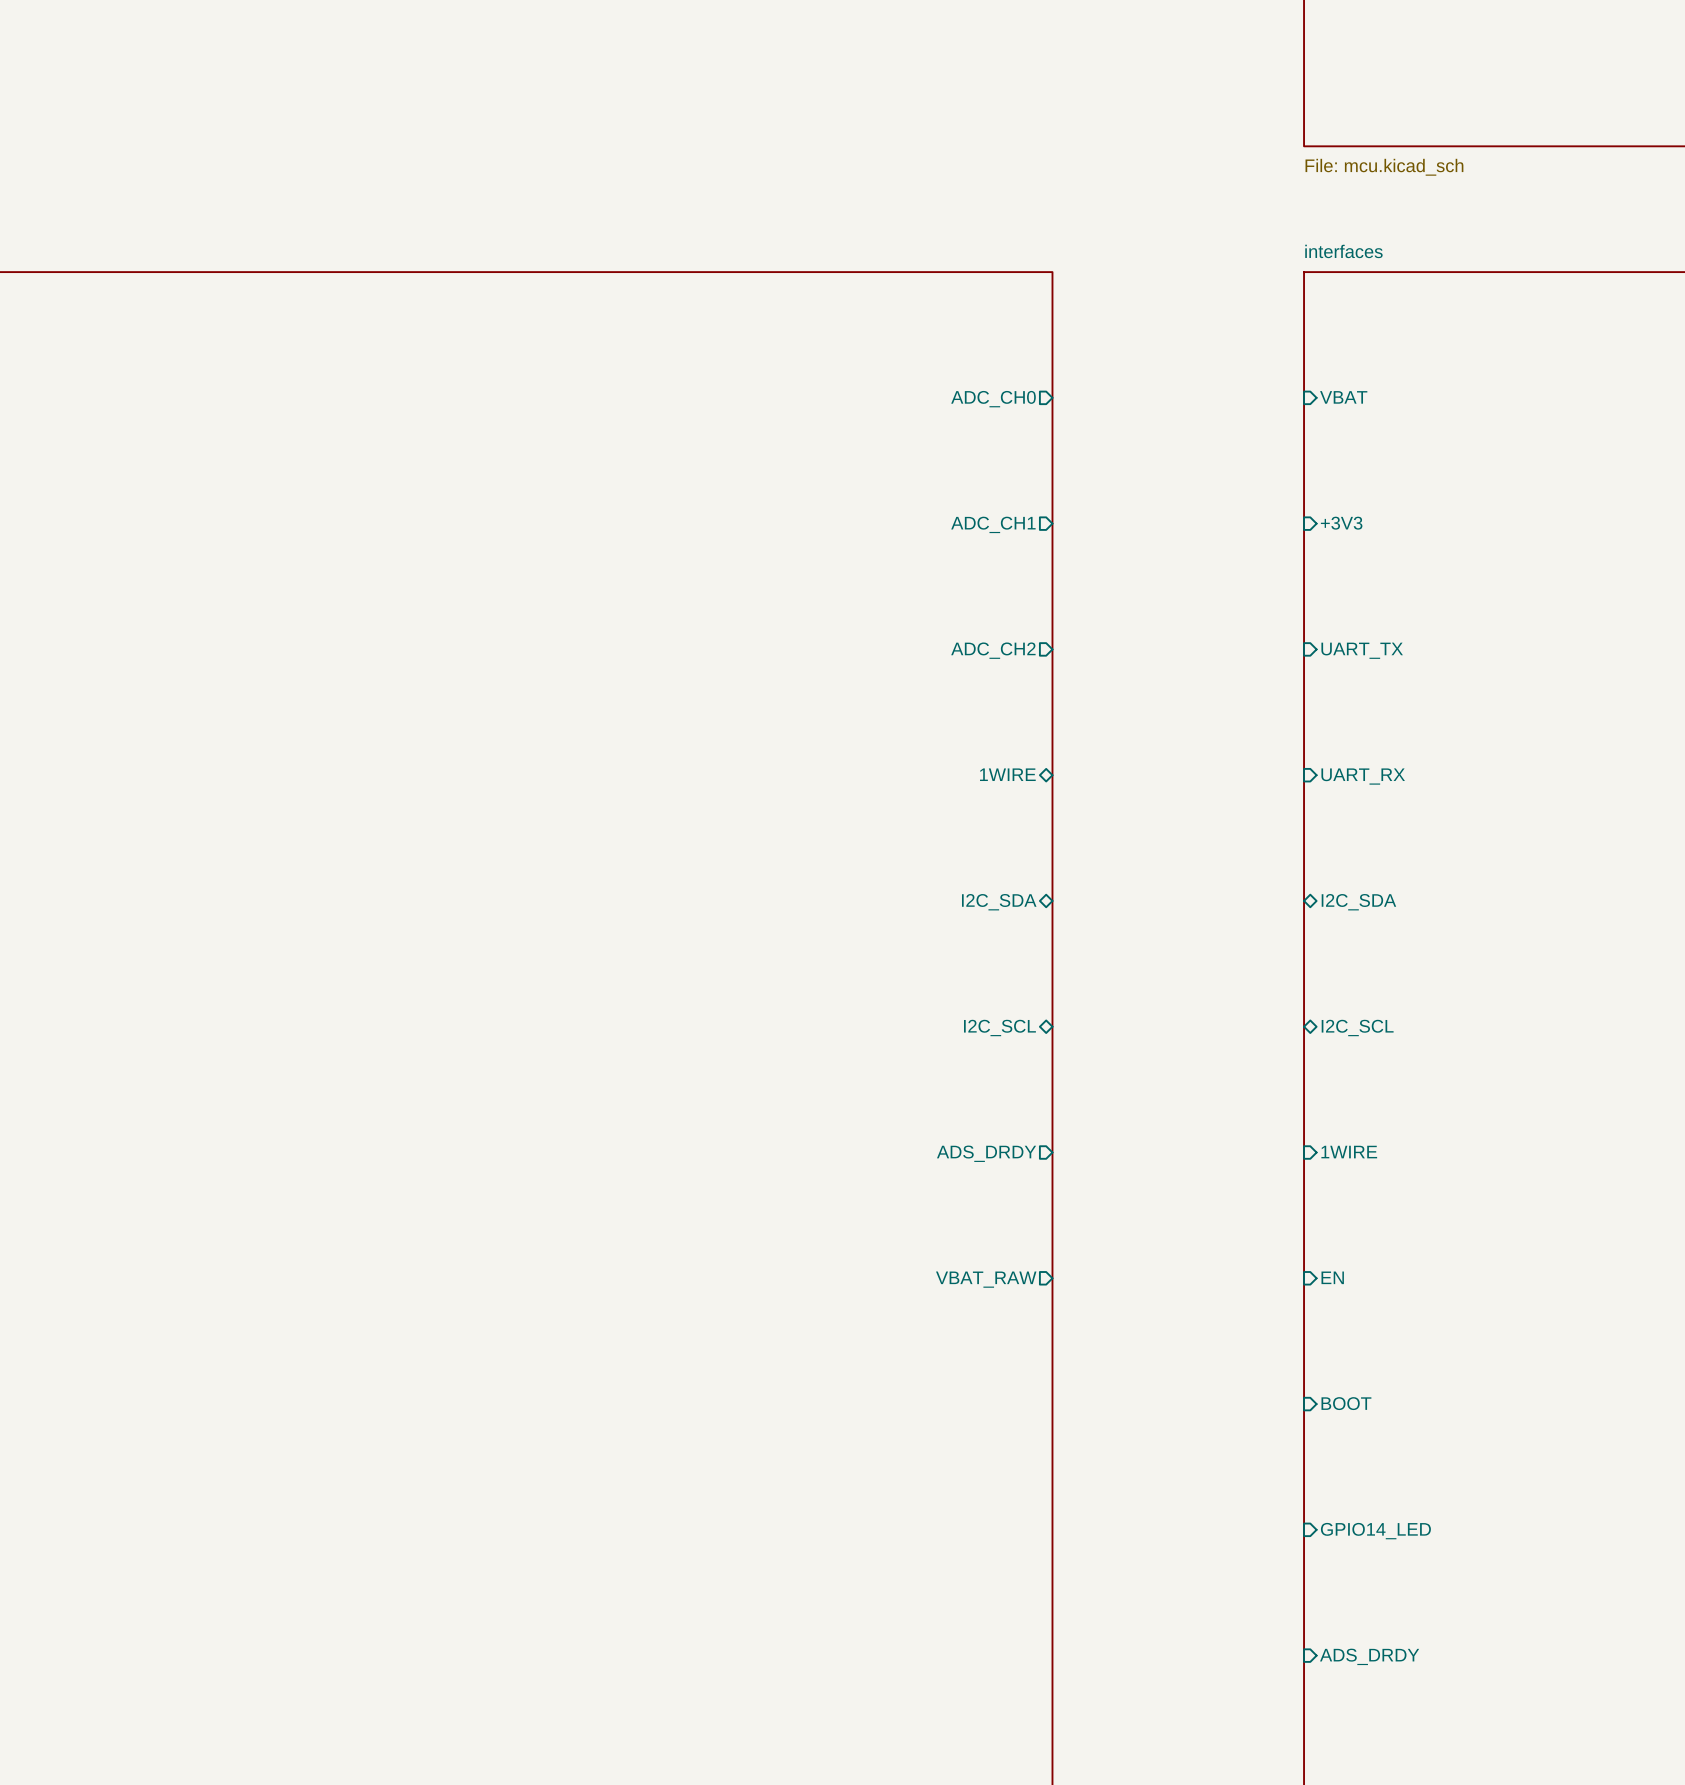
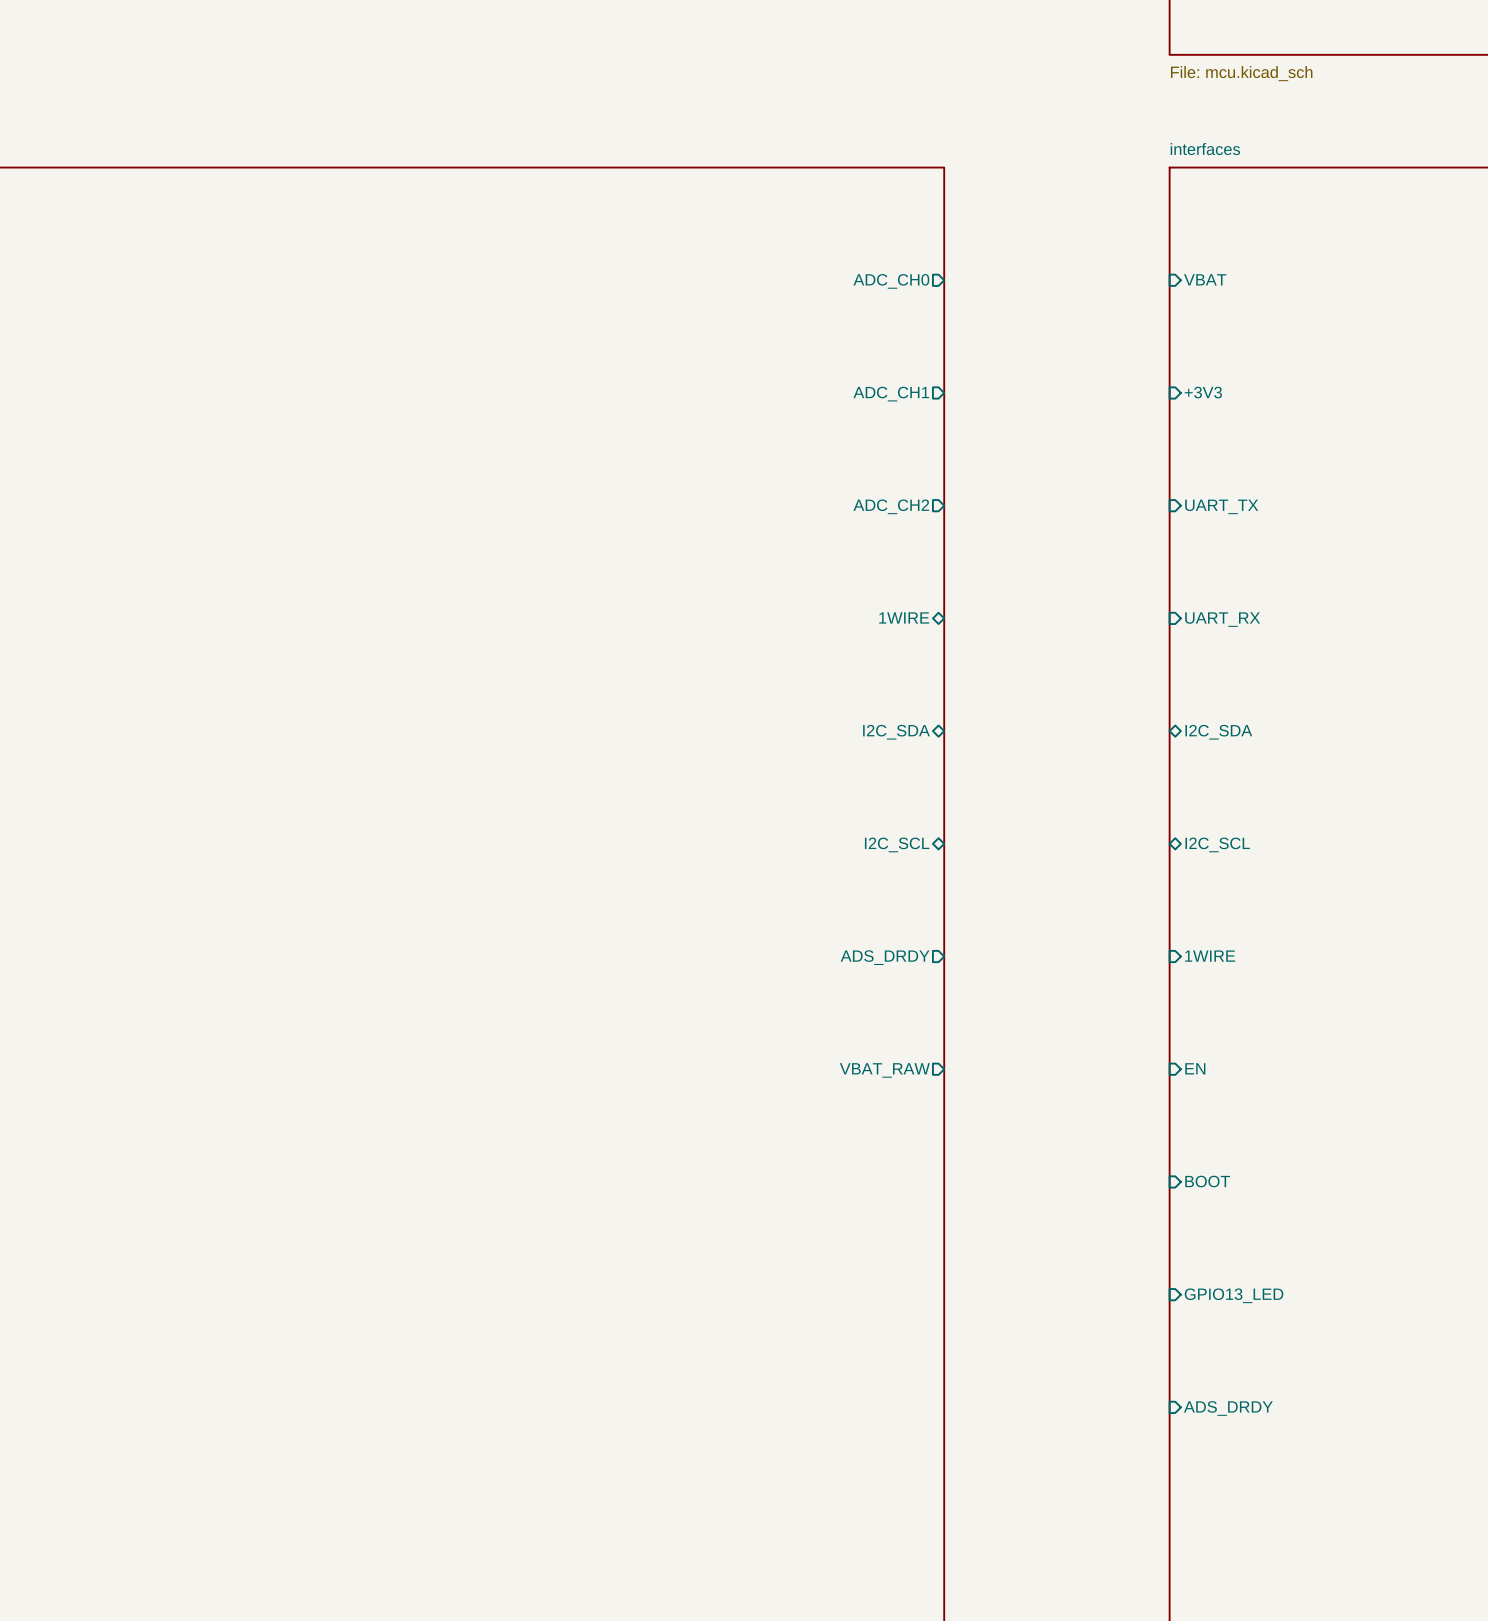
sheet pin: GPIO14_LED (1375, 1531) -> GPIO13_LED (1234, 1295)

